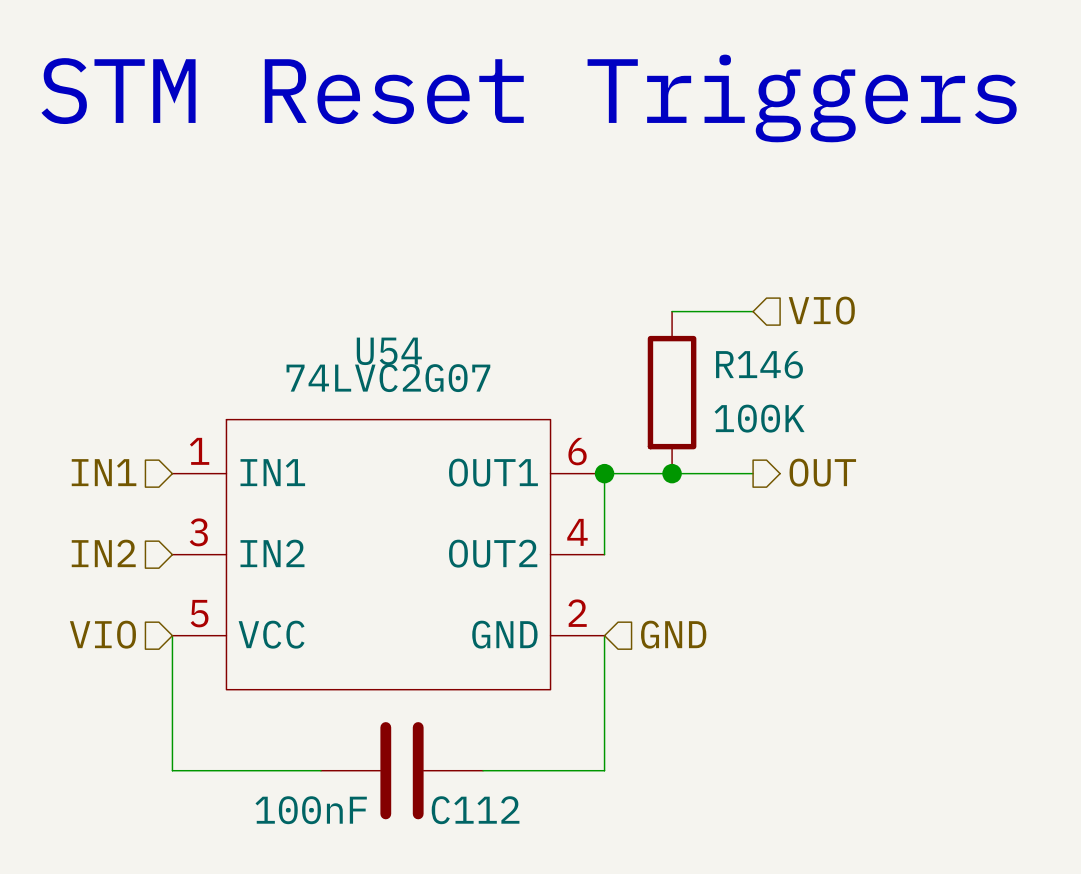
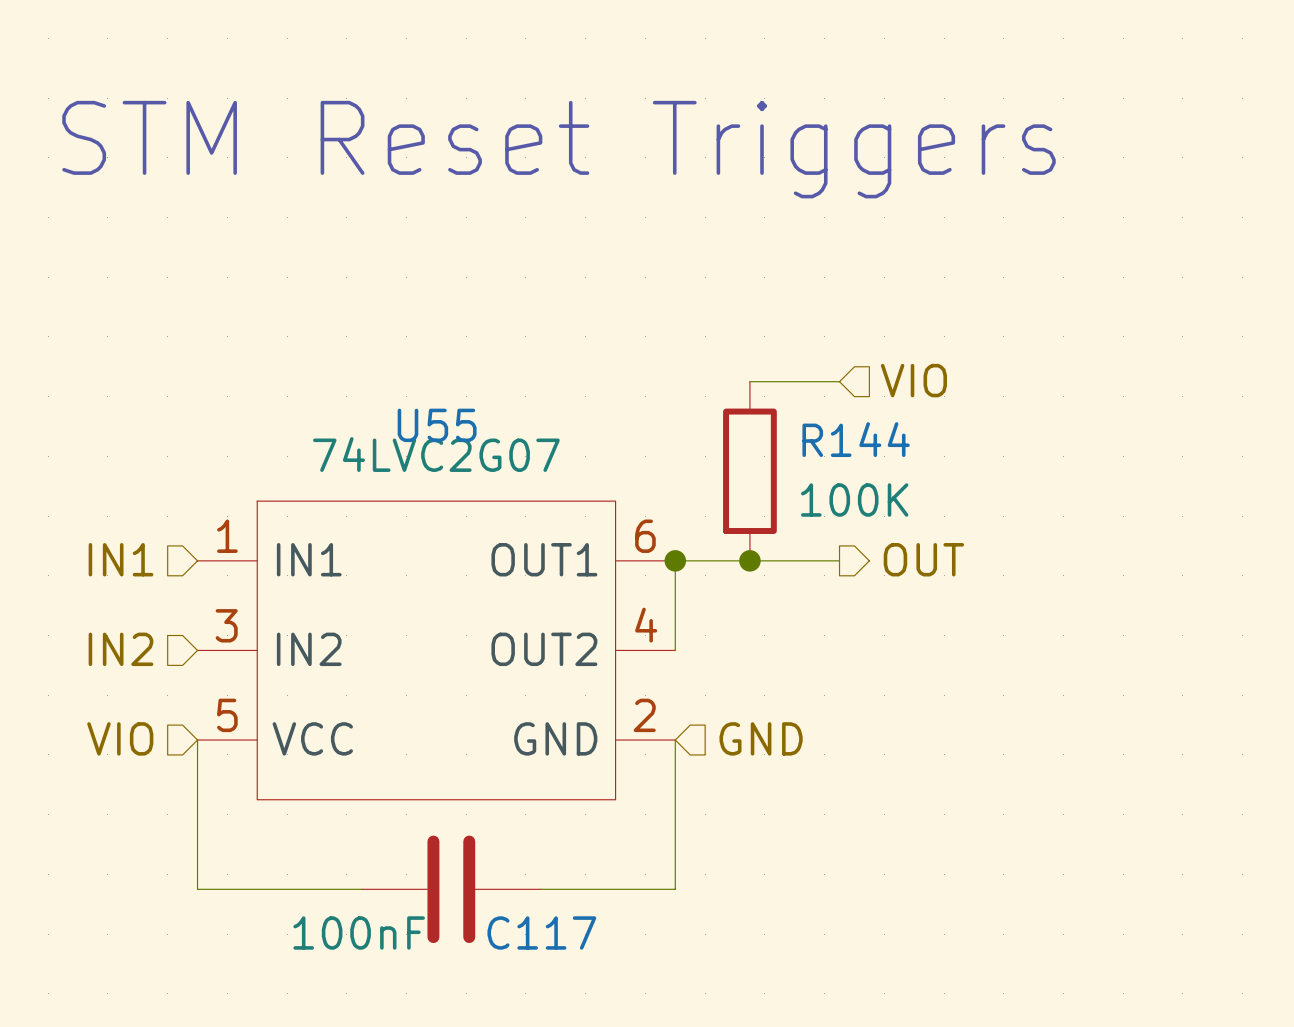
U54 name: U54 (389, 351) -> U55 (437, 425)
R146 name: R146 (759, 364) -> R144 (856, 439)
C112 name: C112 (475, 810) -> C117 (541, 933)

